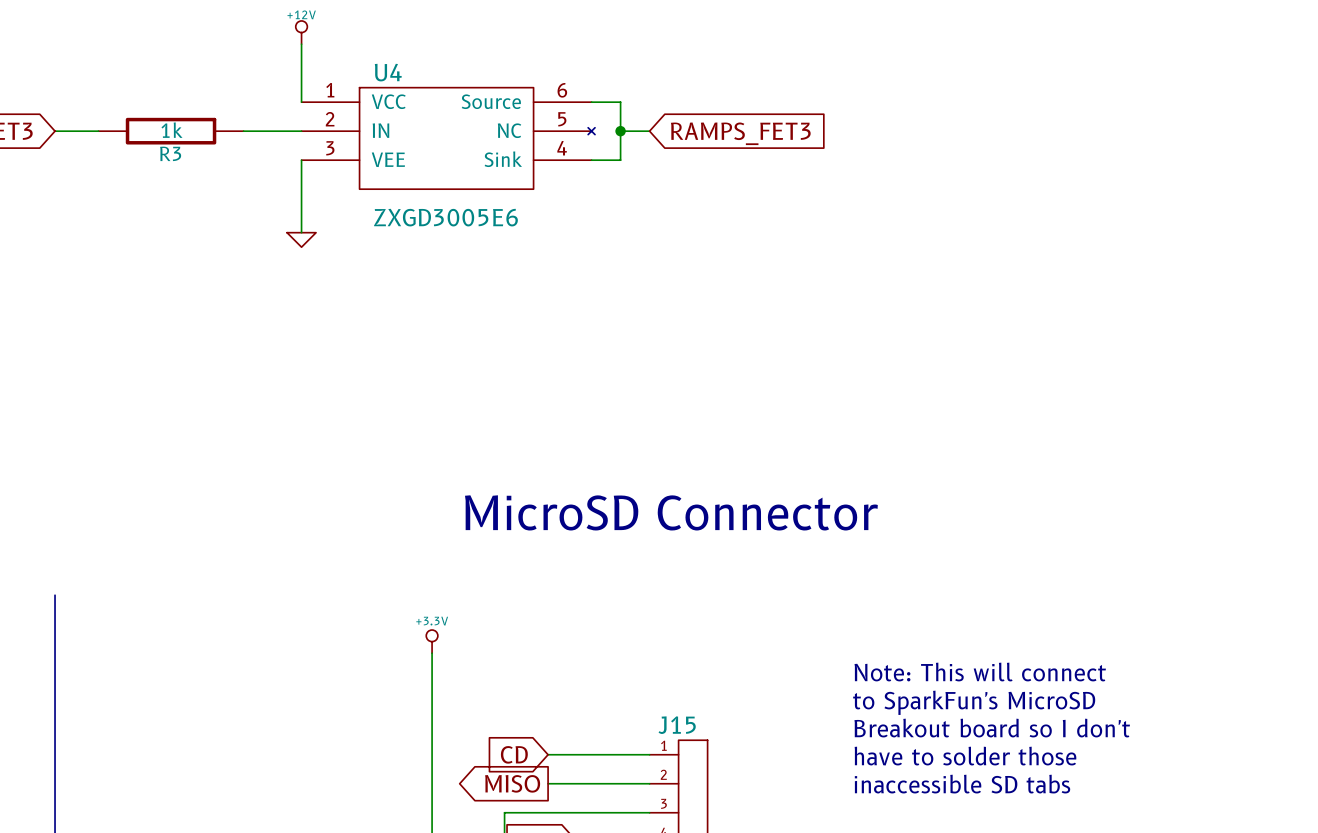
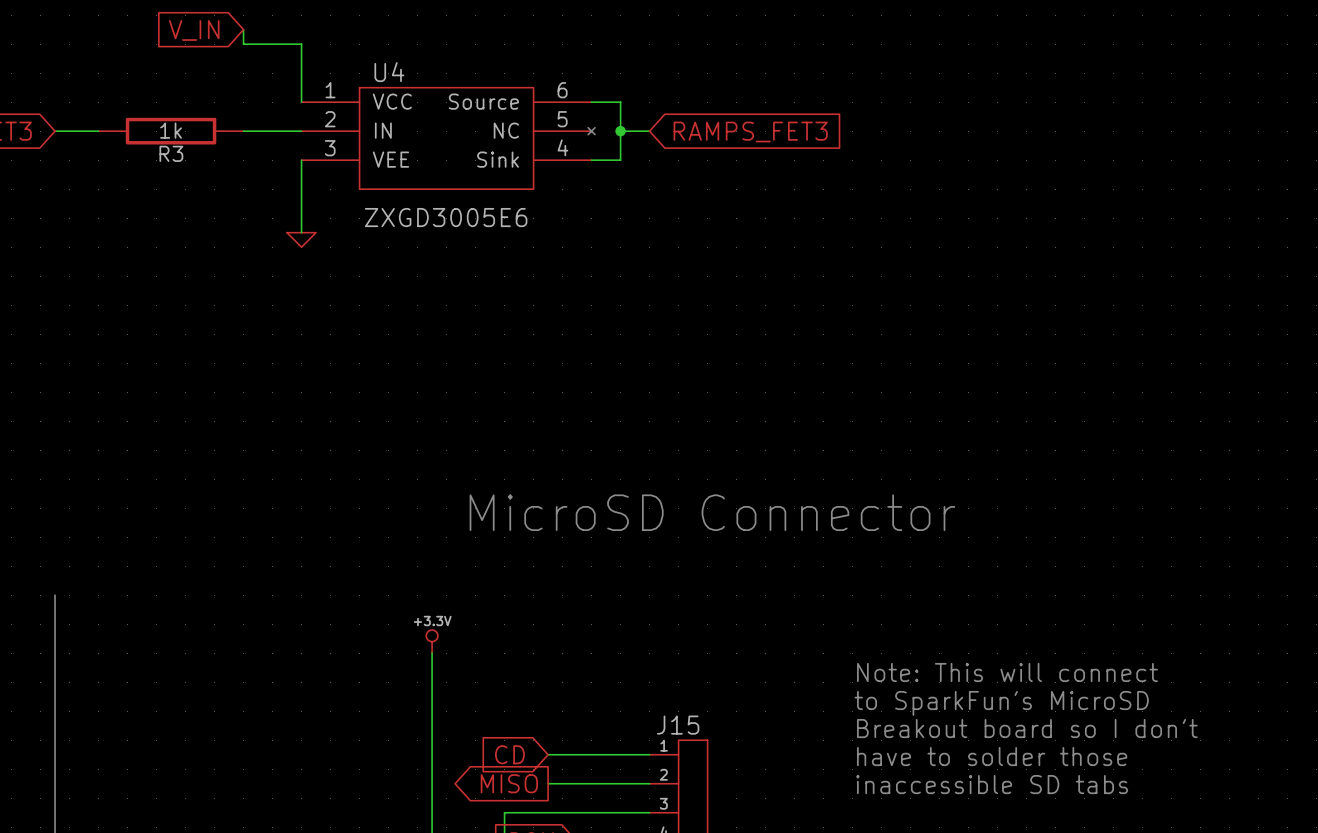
wire: none -> (243, 29) (243, 44) (301, 44)
global label: none -> V_IN (194, 30)
power symbol: +12V (301, 32) -> none

